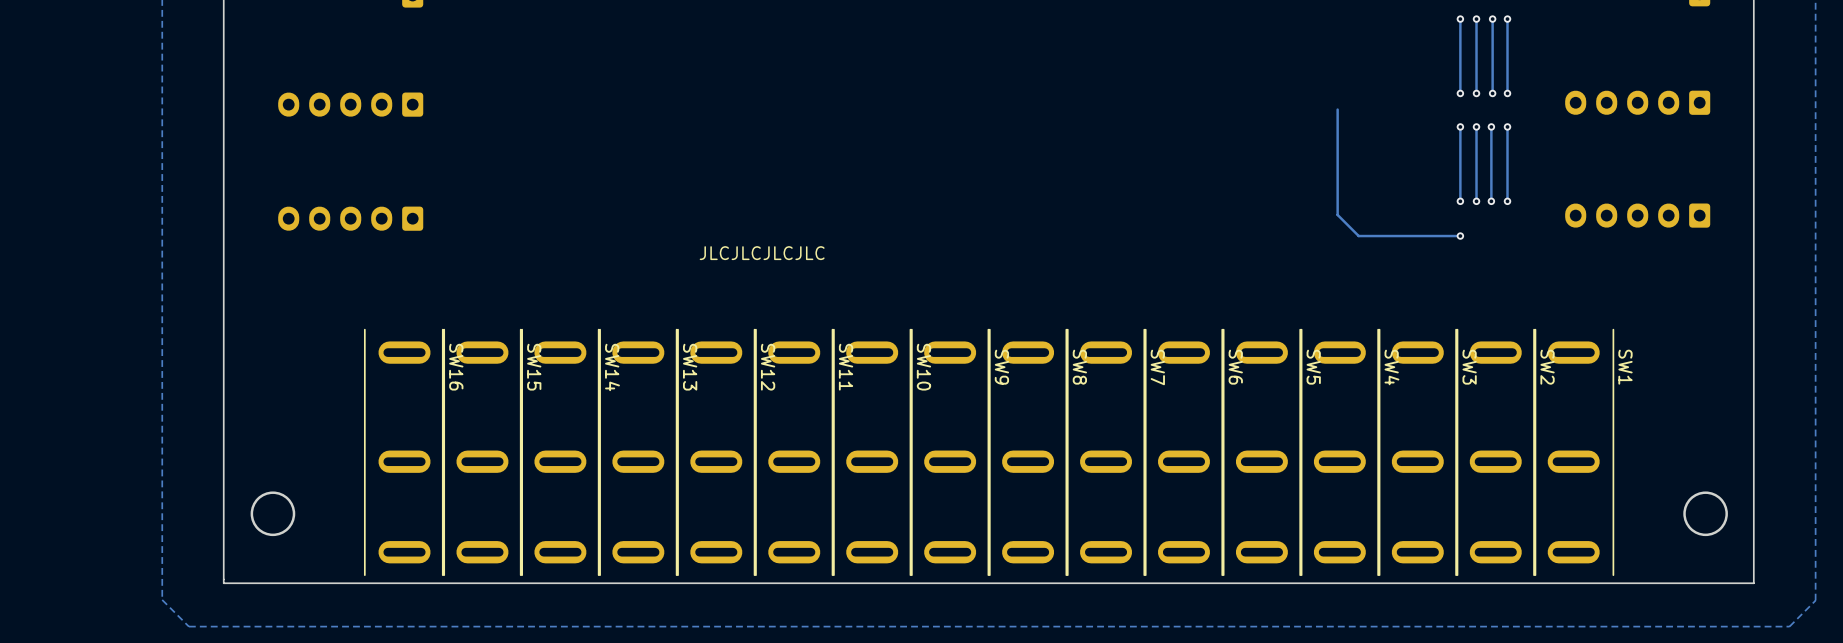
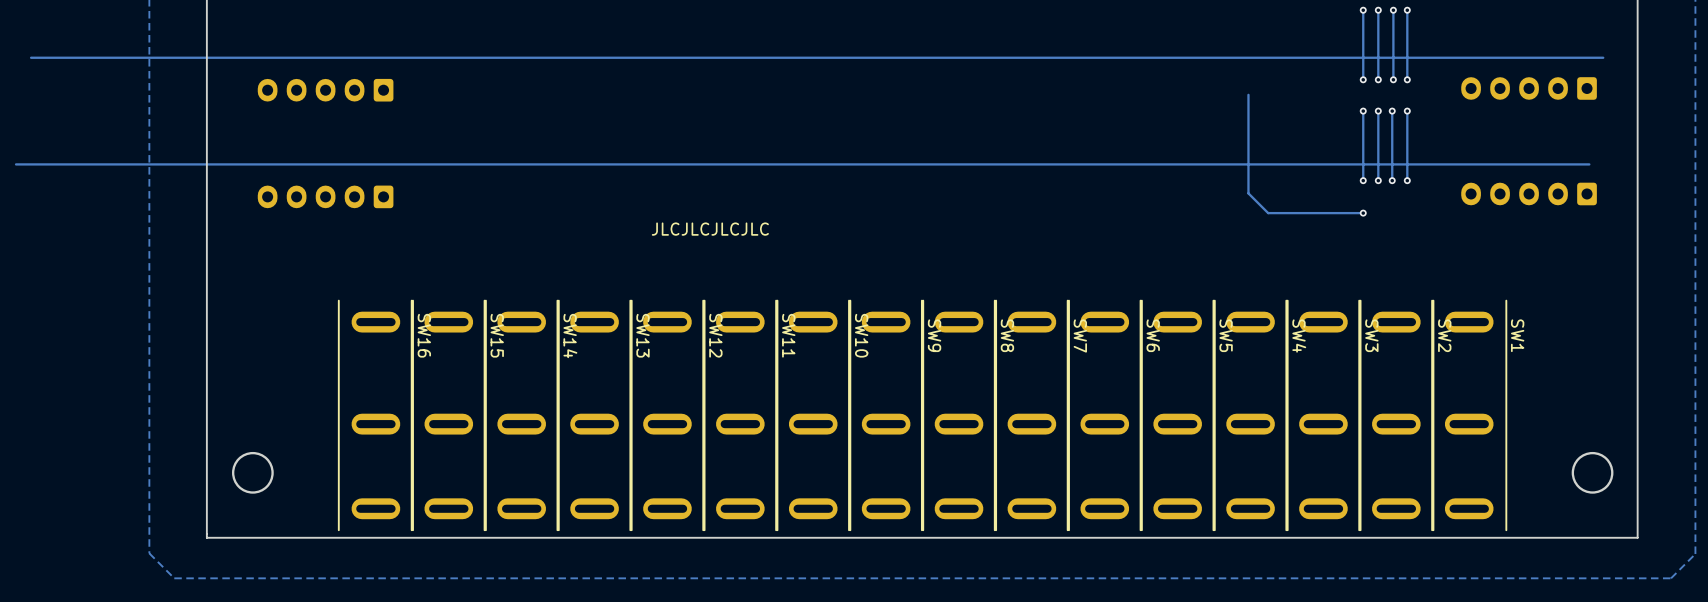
track: none -> (1603, 57) (31, 57)
track: none -> (1589, 164) (16, 164)

